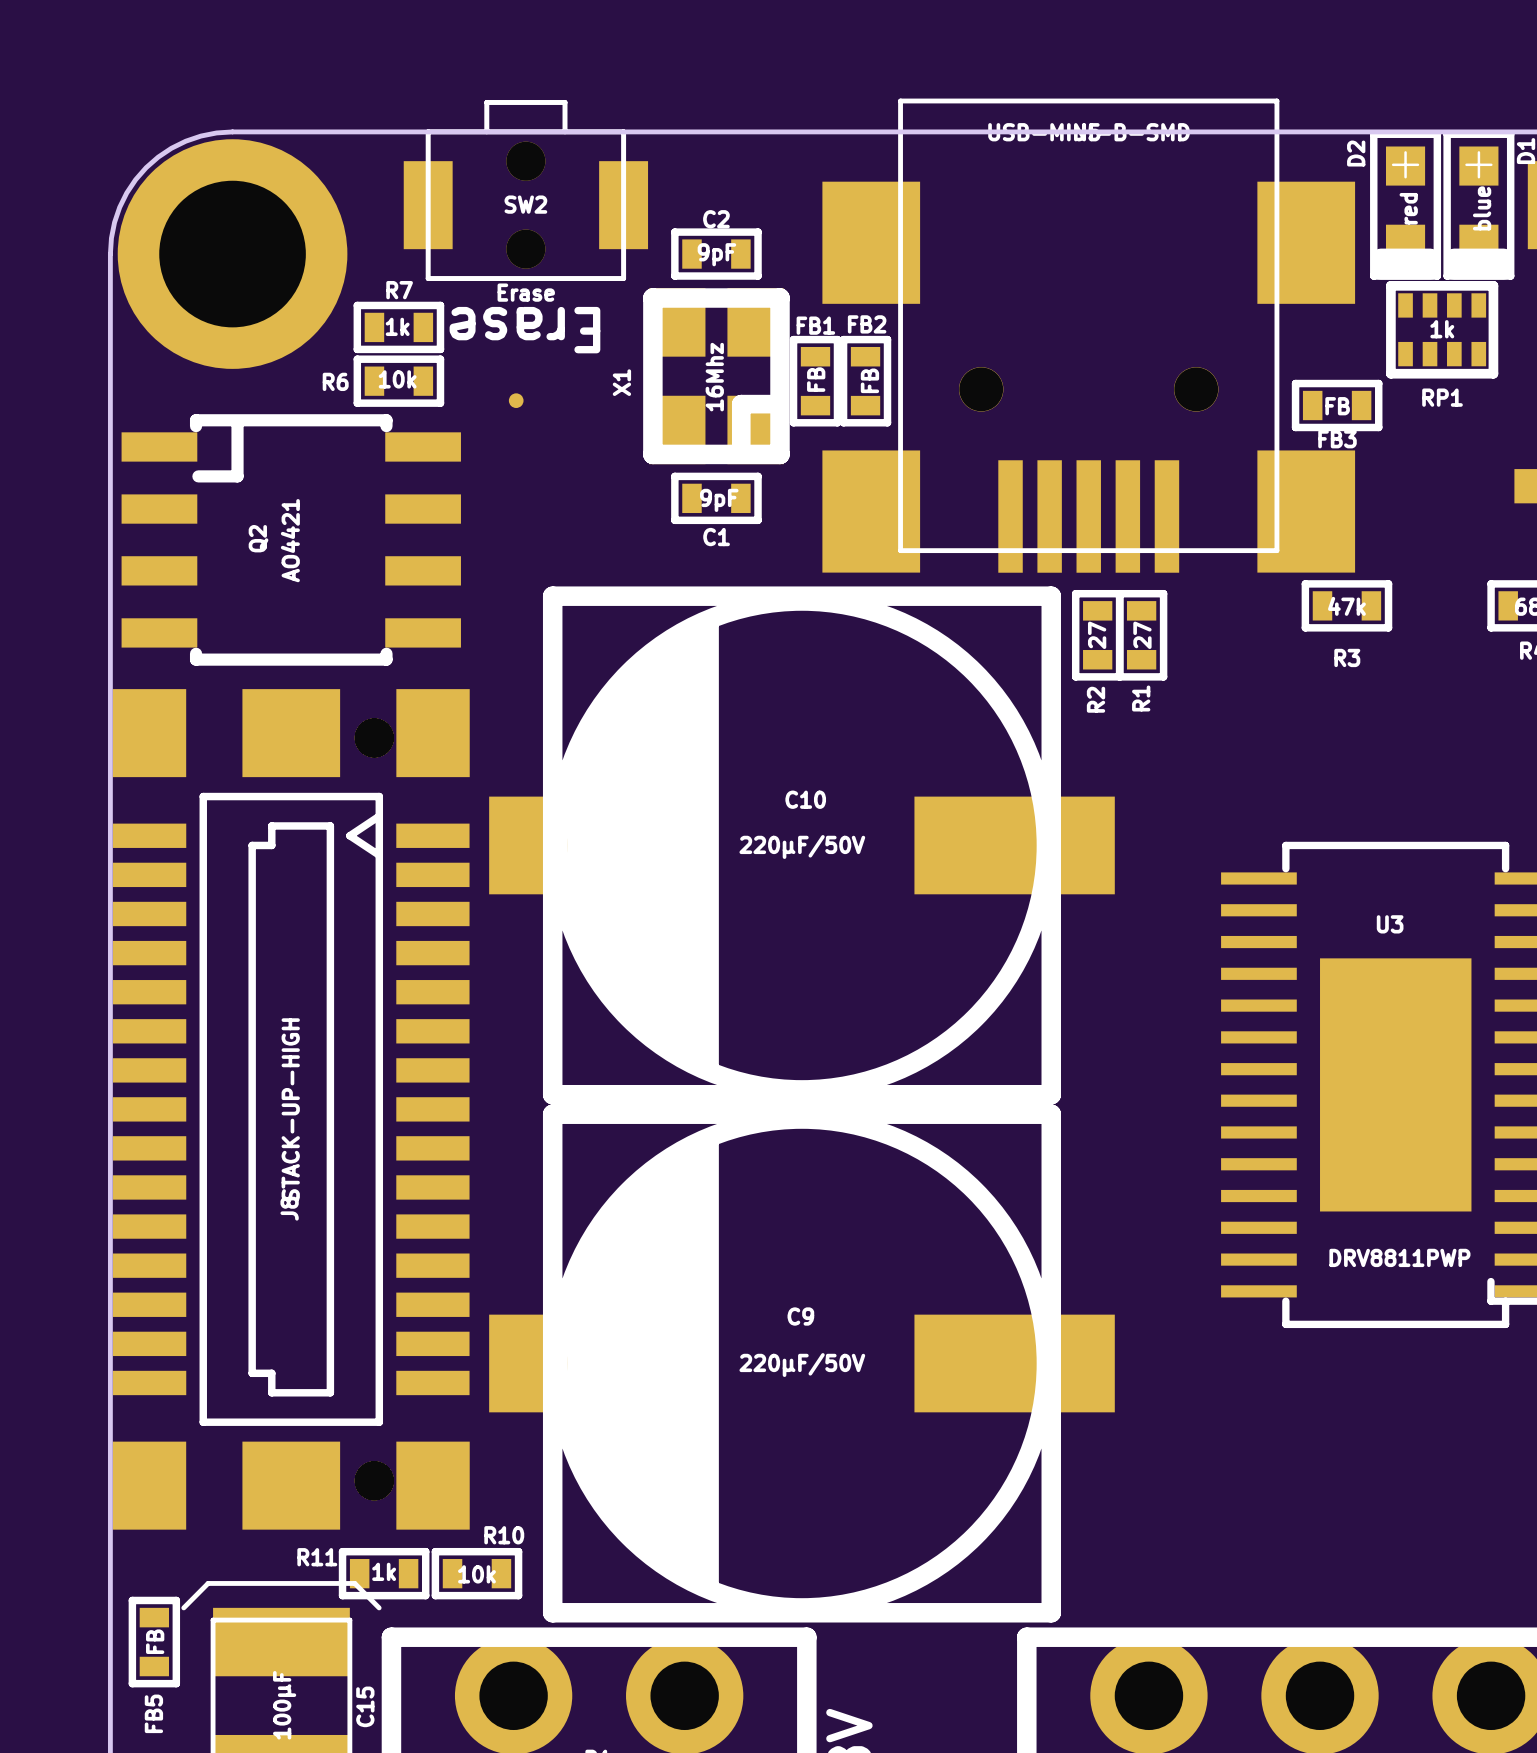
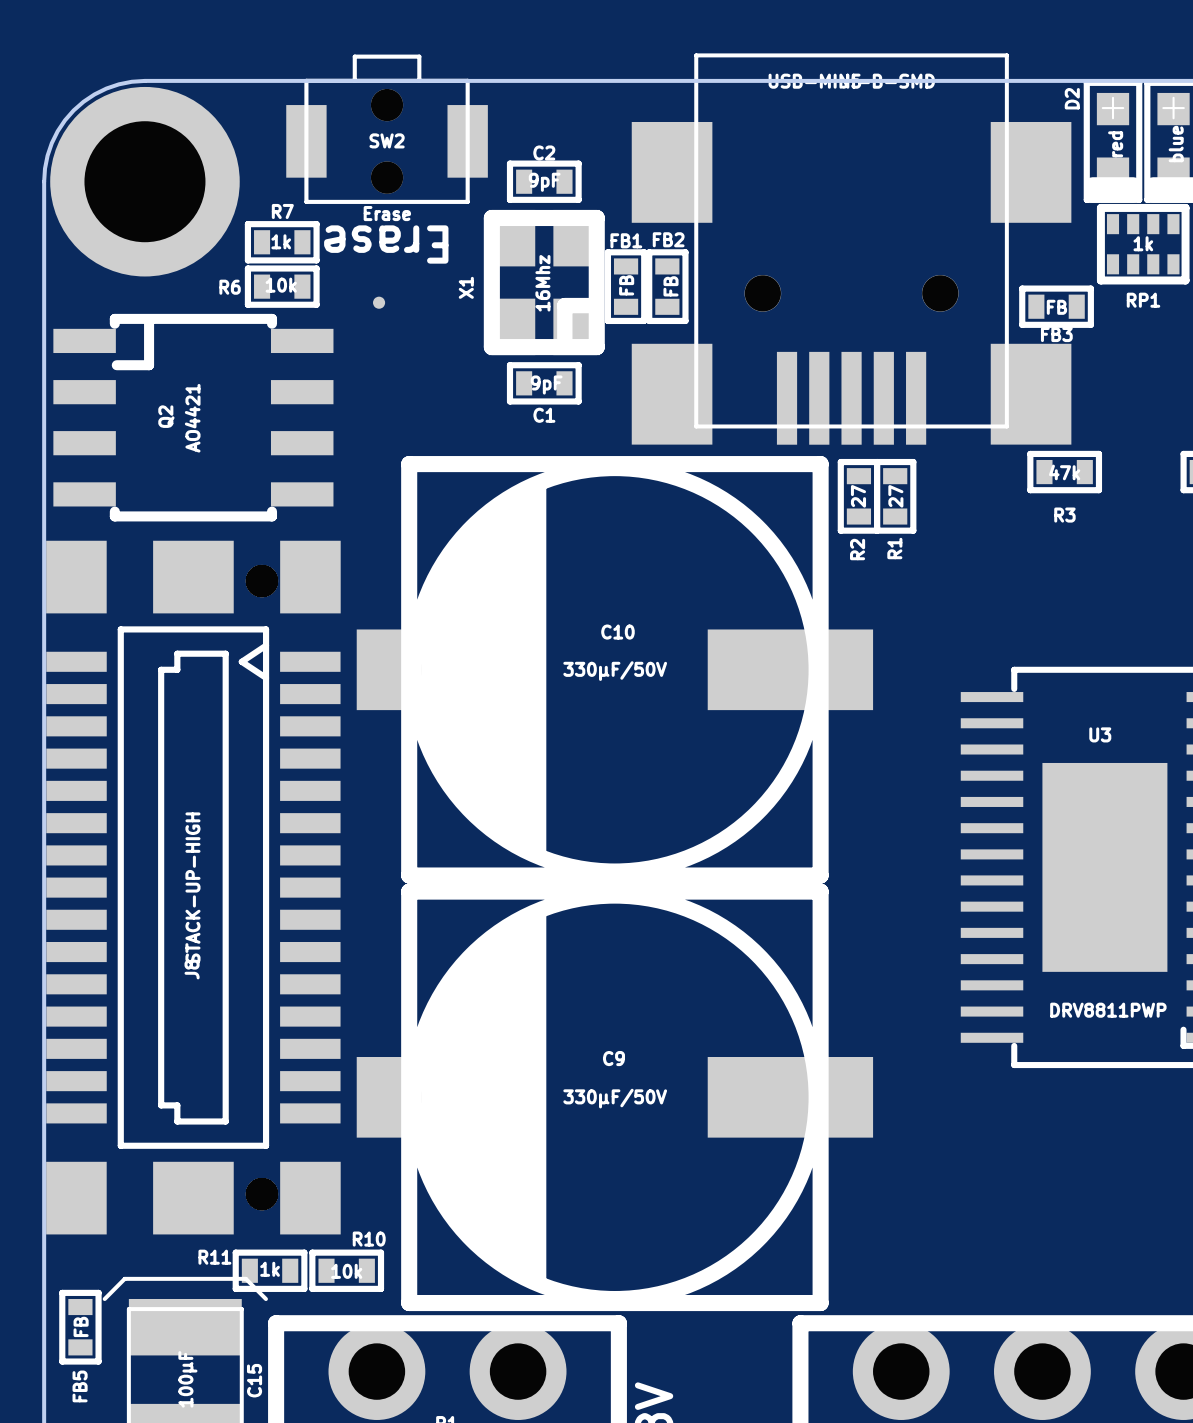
C10 value: 220µF/50V (802, 847) -> 330µF/50V (615, 671)
C9 value: 220µF/50V (802, 1365) -> 330µF/50V (615, 1098)

